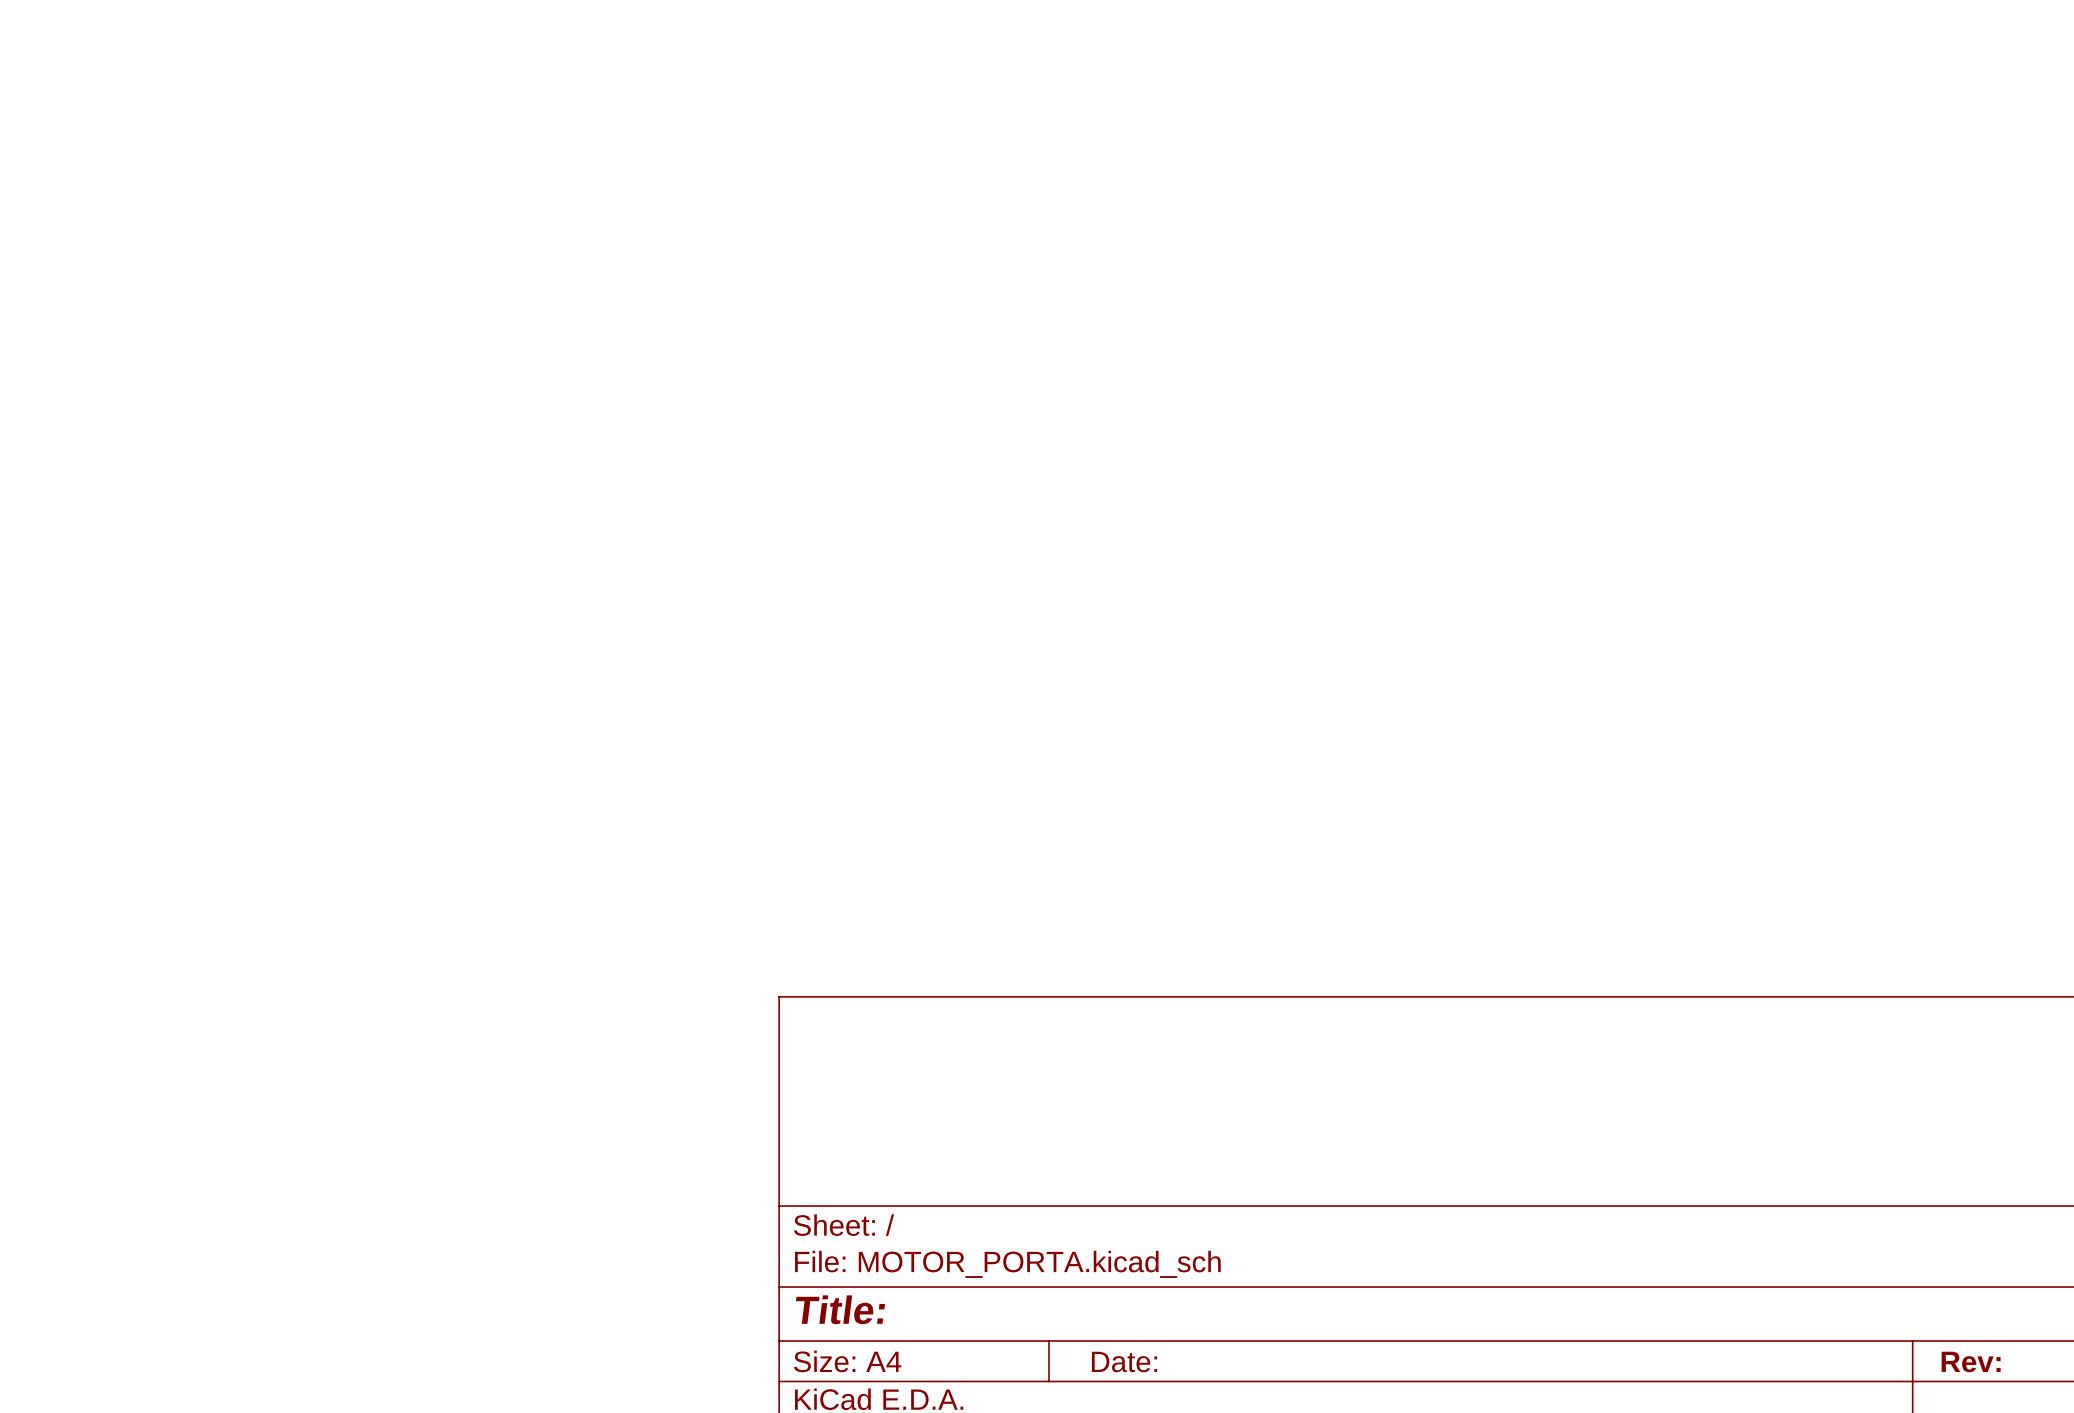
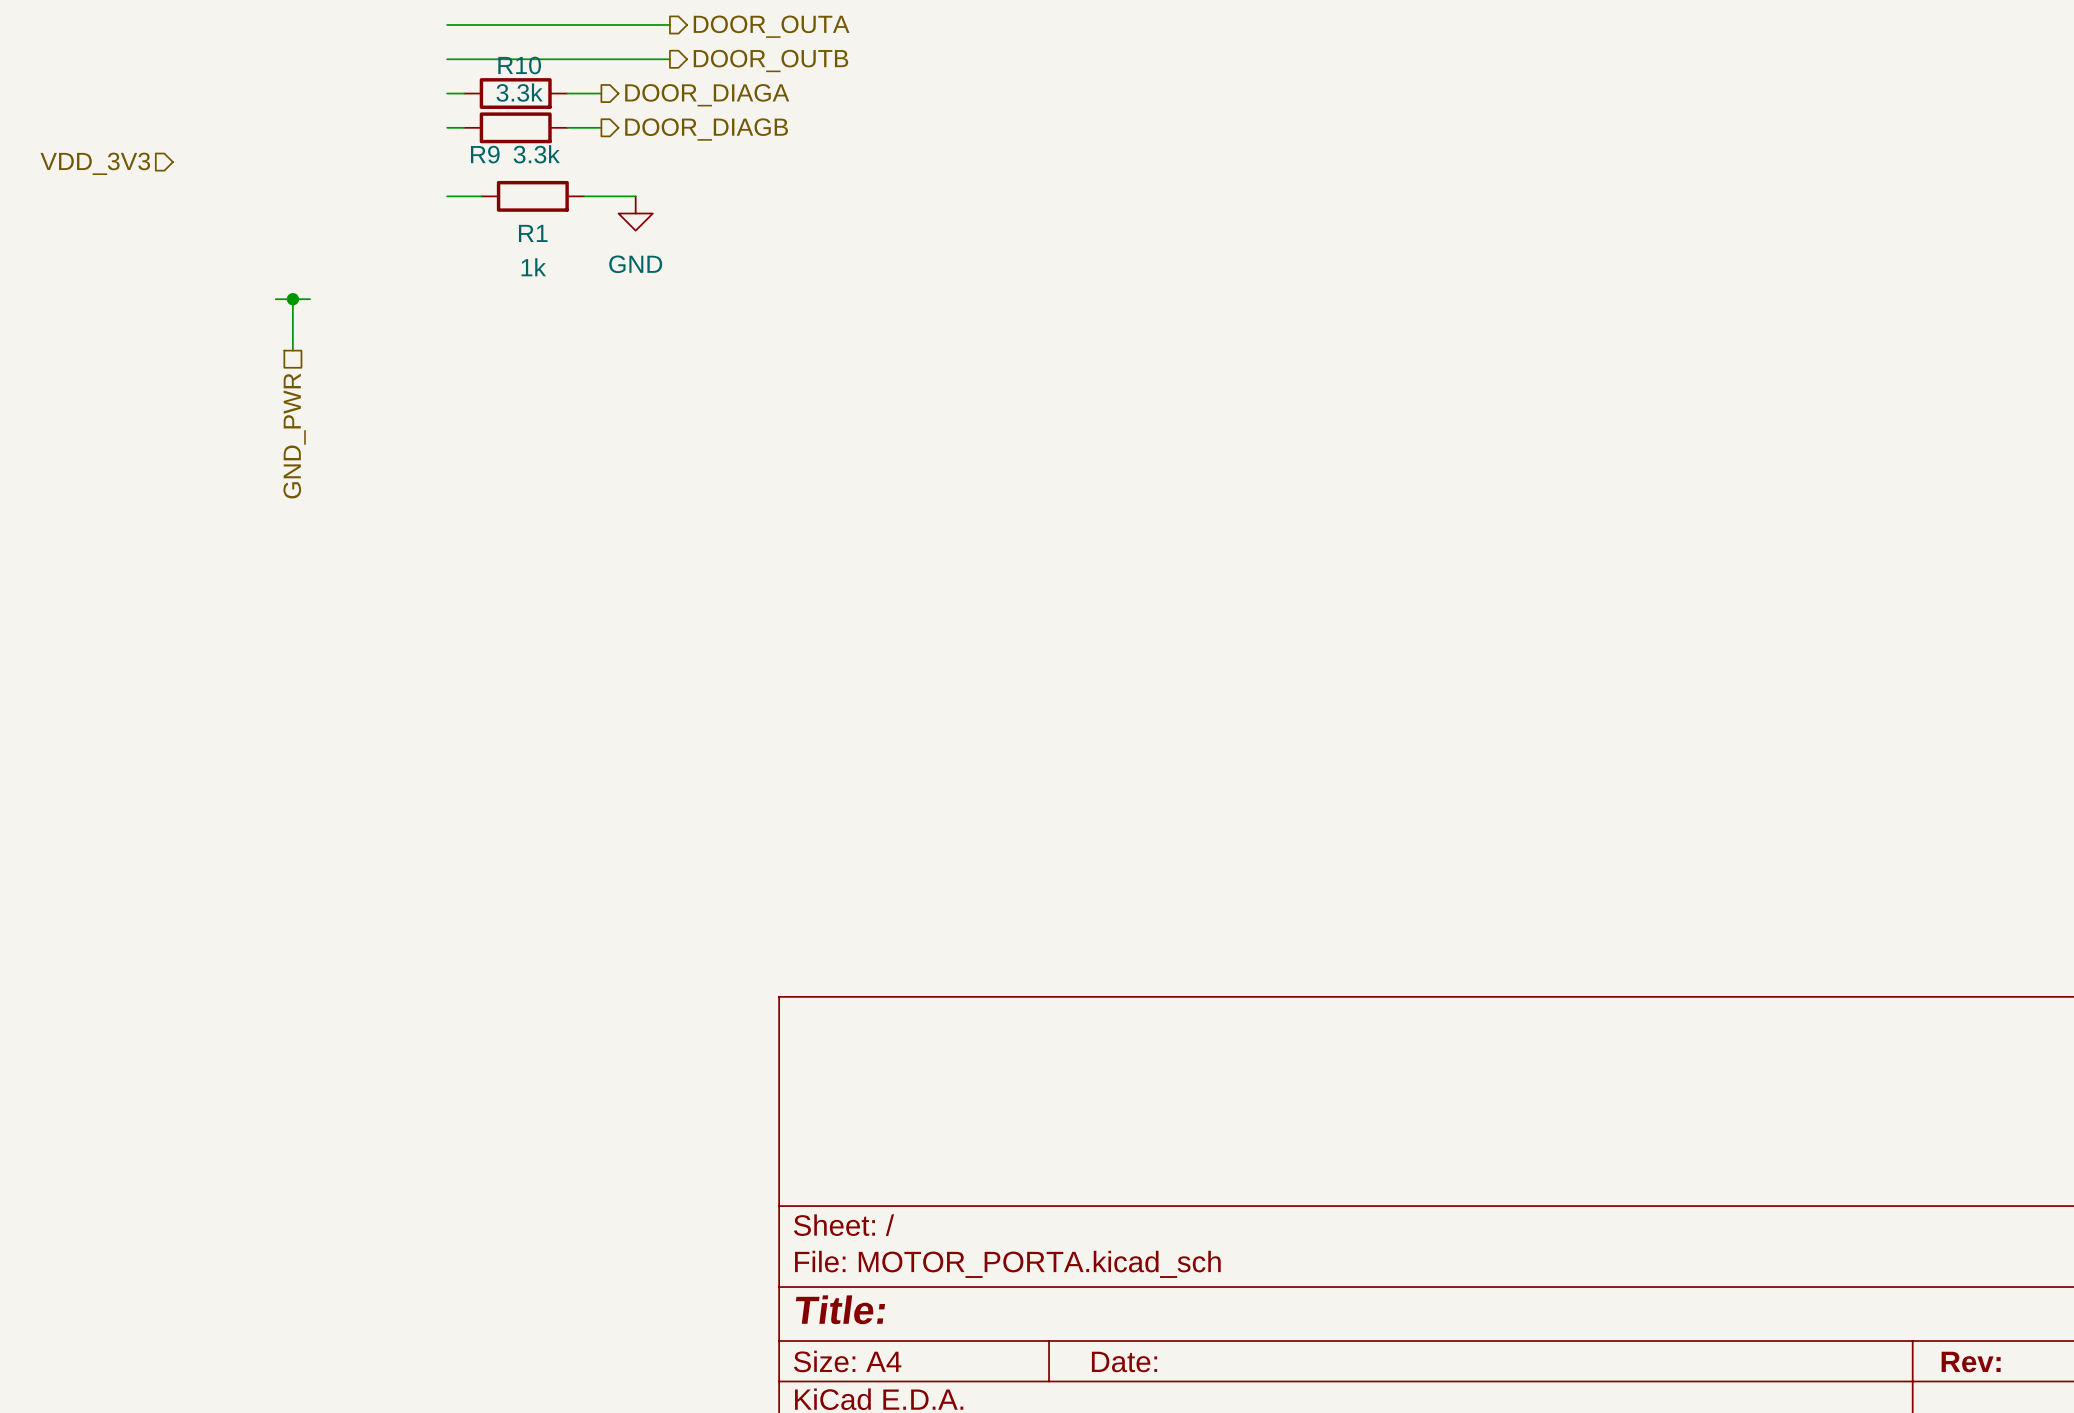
wire: none -> (447, 24) (669, 24)
hierarchical label: none -> DOOR_OUTA (771, 26)
wire: none -> (447, 59) (669, 59)
hierarchical label: none -> DOOR_OUTB (770, 60)
wire: none -> (447, 93) (464, 93)
R10: none -> 3.3k (515, 93)
wire: none -> (567, 93) (601, 93)
hierarchical label: none -> DOOR_DIAGA (707, 95)
wire: none -> (447, 127) (464, 127)
R9: none -> 3.3k (515, 127)
wire: none -> (567, 127) (601, 127)
hierarchical label: none -> DOOR_DIAGB (706, 129)
hierarchical label: none -> VDD_3V3 (95, 163)
wire: none -> (447, 196) (481, 196)
R1: none -> 1k (532, 196)
wire: none -> (584, 196) (635, 196)
power symbol: none -> GND (635, 213)
wire: none -> (275, 299) (310, 299)
wire: none -> (292, 299) (292, 350)
junction: none -> (292, 299)
hierarchical label: none -> GND_PWR (294, 436)

